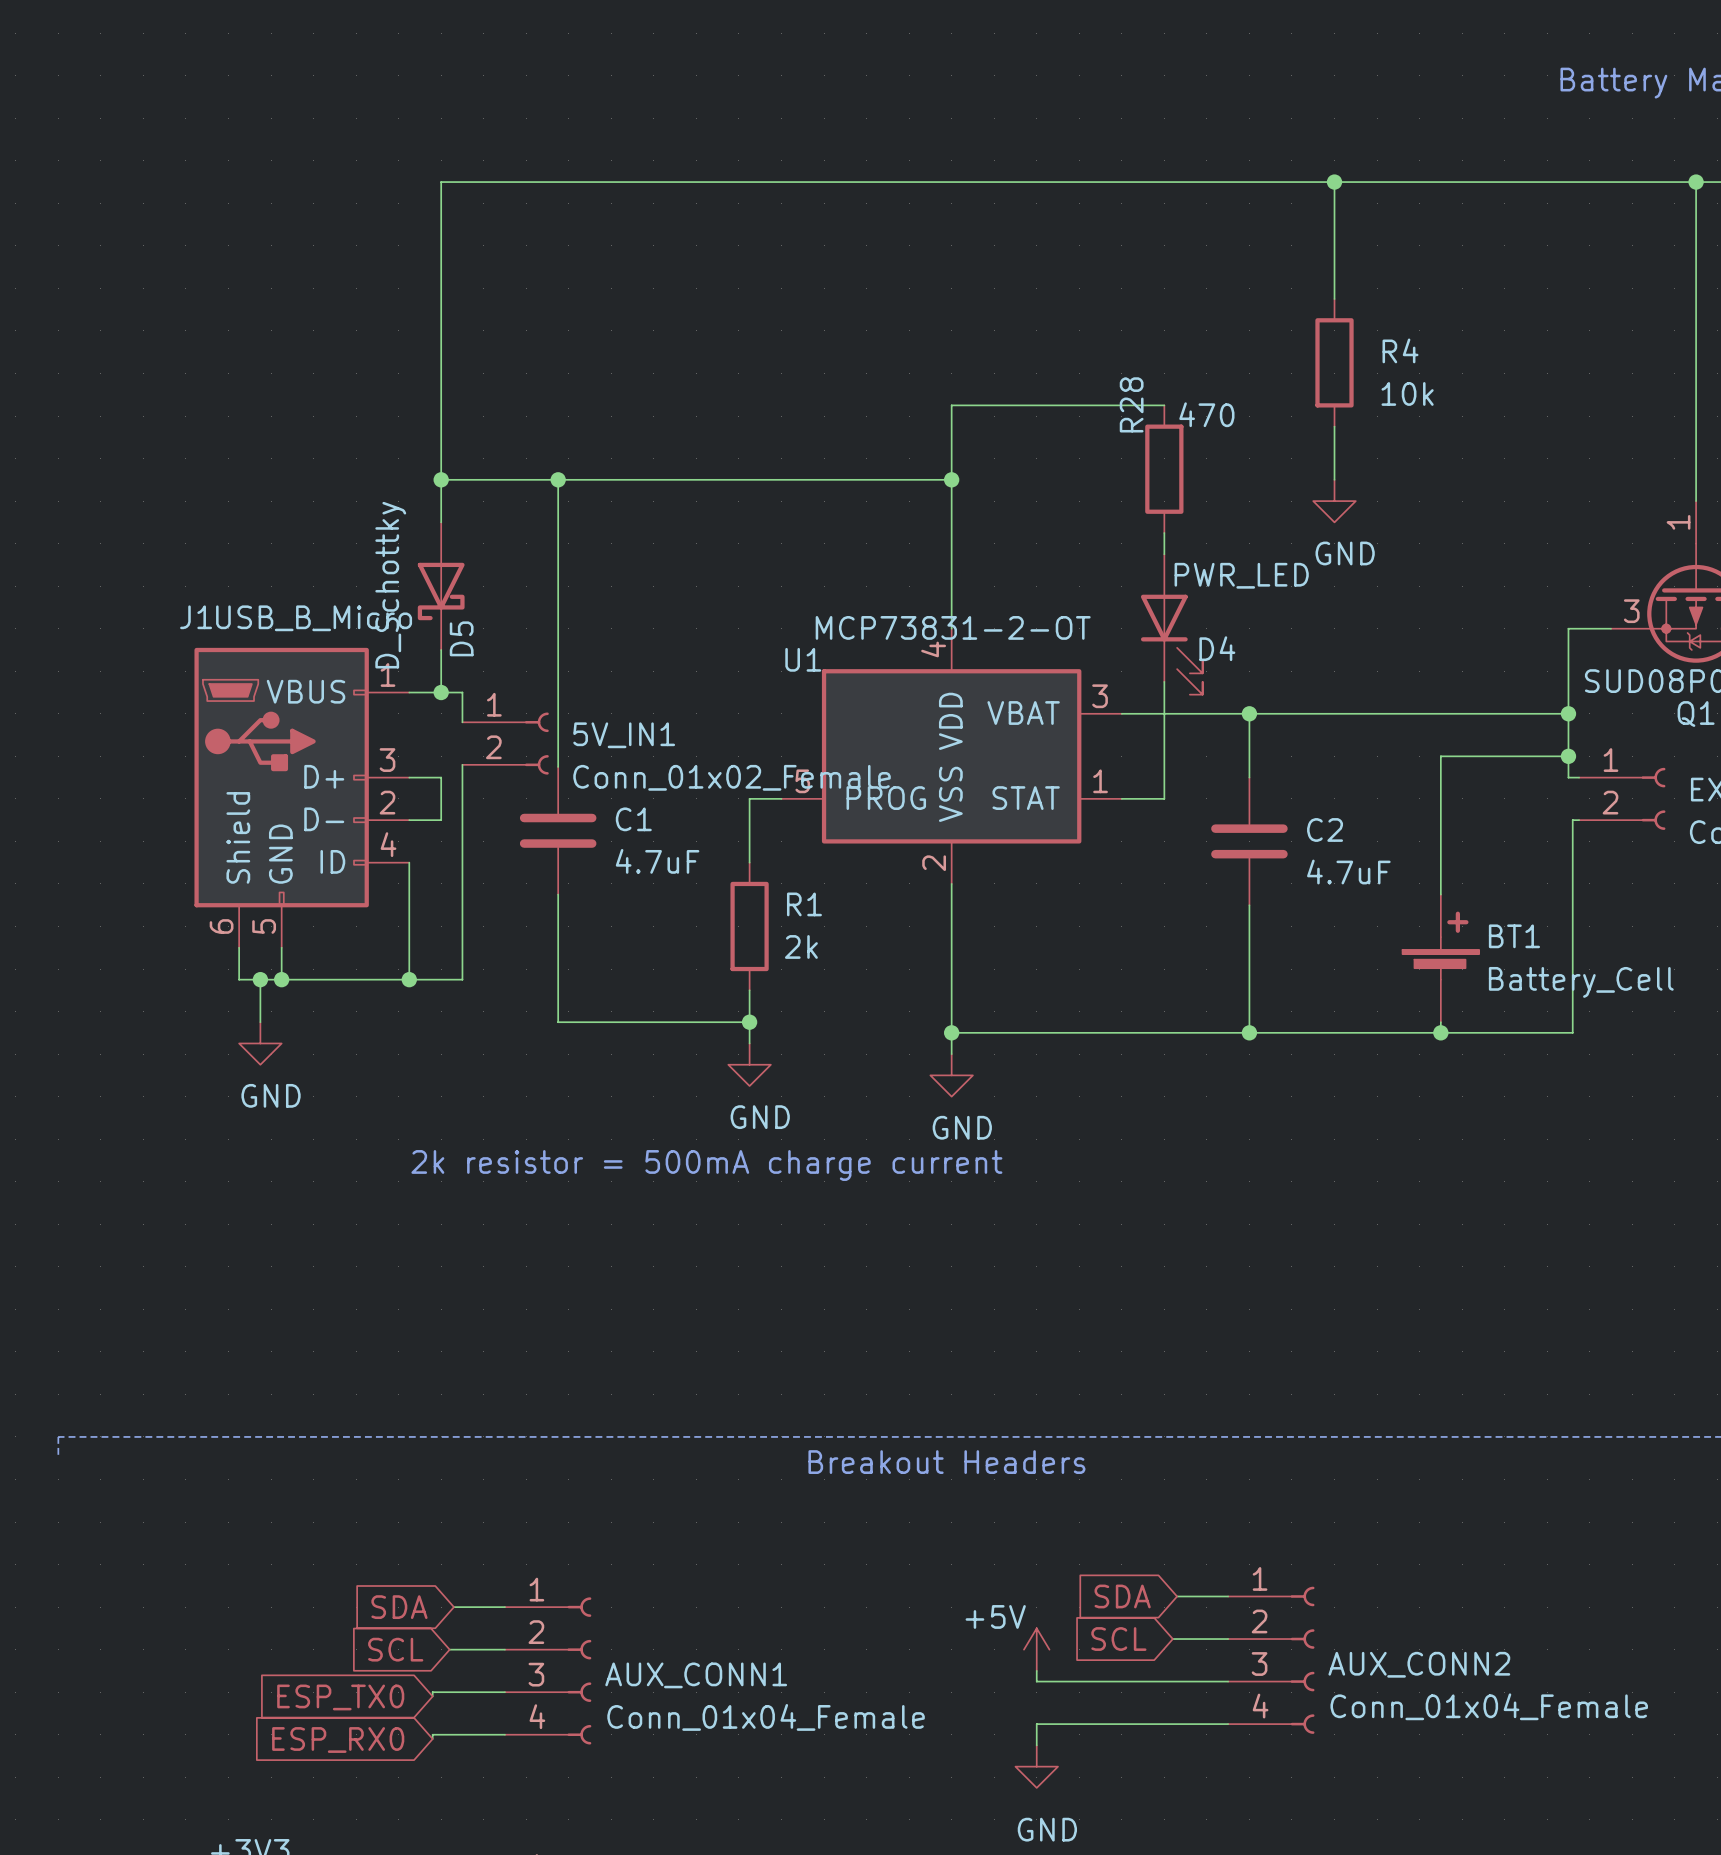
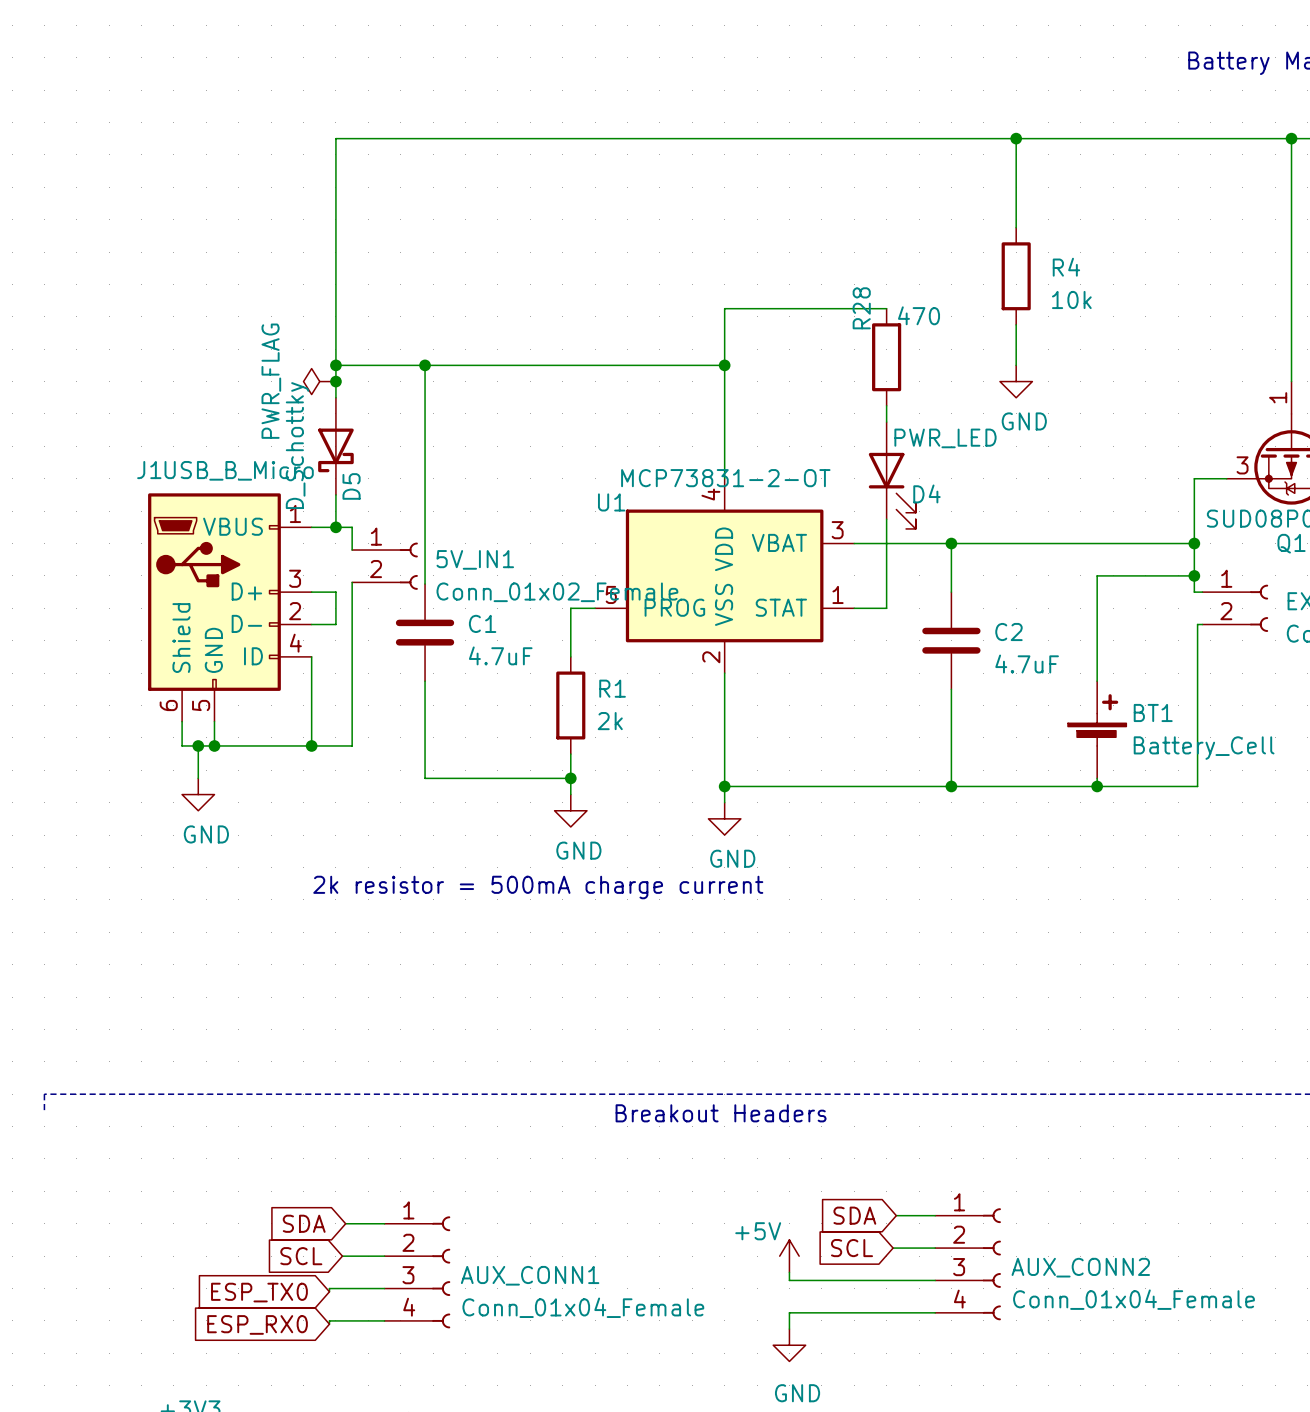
power symbol: none -> PWR_FLAG (319, 381)
junction: none -> (335, 381)

